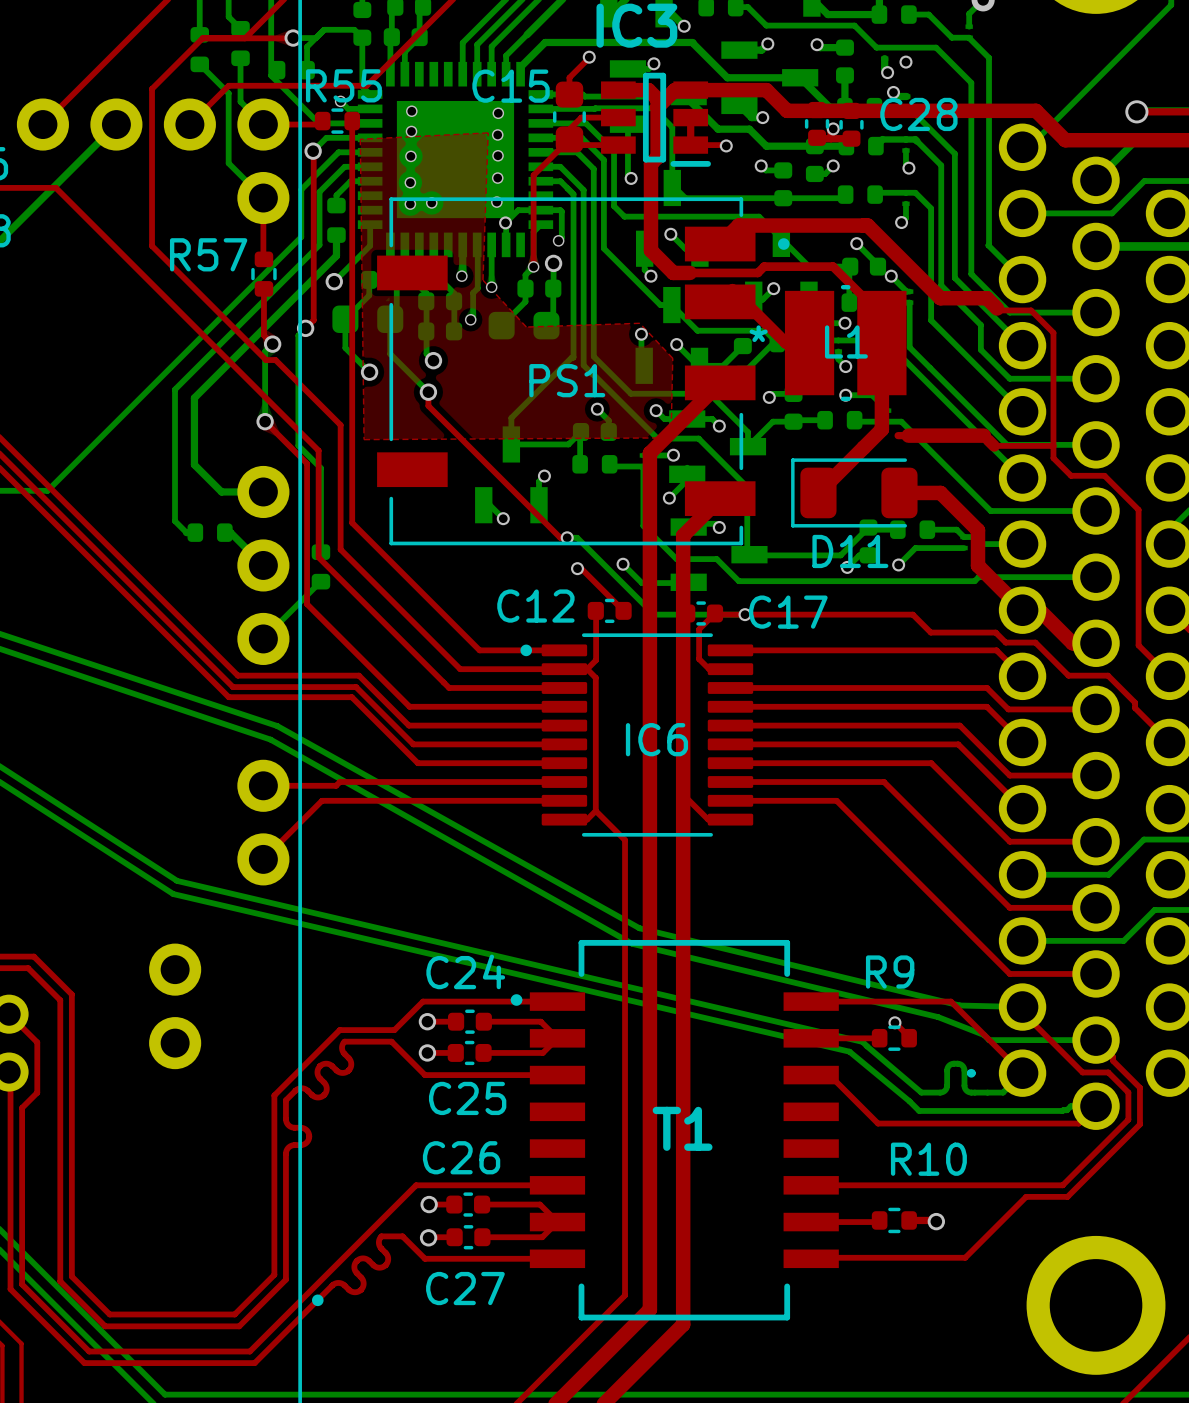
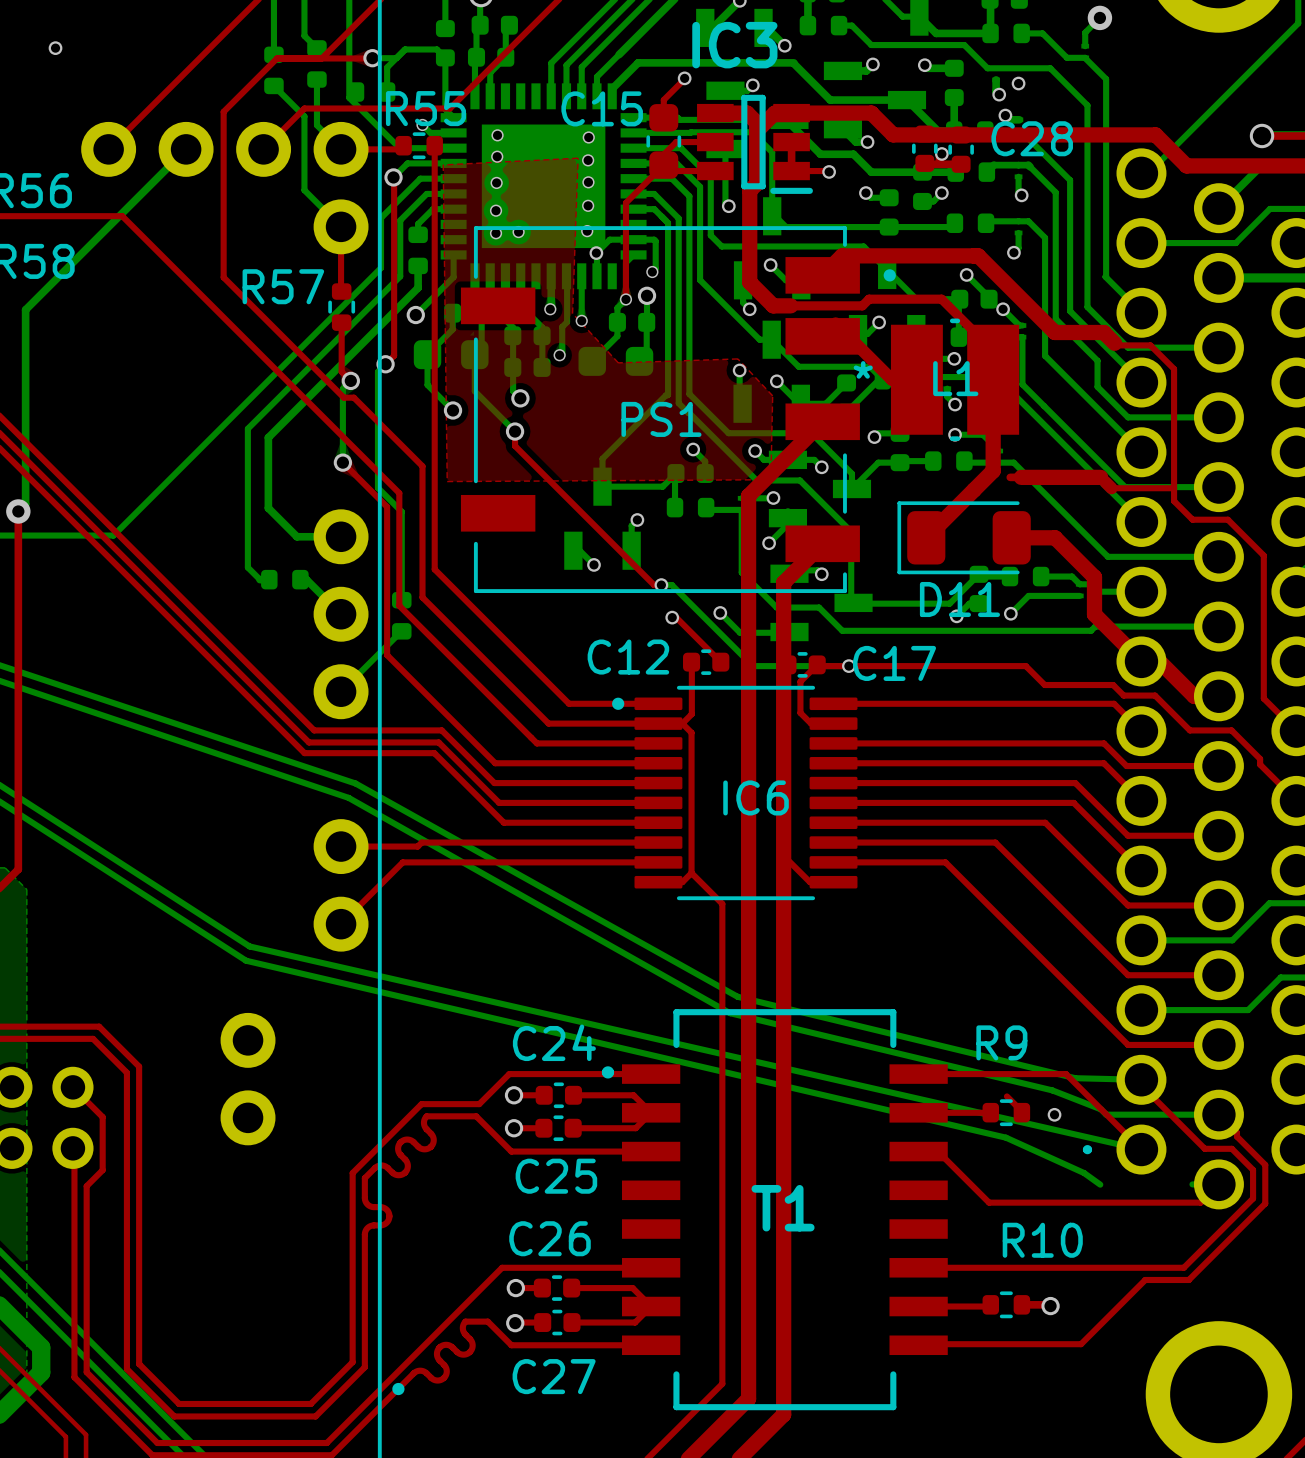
bottom track: (176, 880) (862, 1041) (921, 1092) (940, 1092) (945, 1090) (947, 1086) (947, 1069) (952, 1063) (959, 1063) (963, 1066) (964, 1087) (970, 1092) (1003, 1092) (1022, 1073) -> (249, 946) (1141, 1149)
bottom track: (173, 894) (849, 1051) (919, 1110) (1062, 1110) (1066, 1110) (1070, 1106) -> (246, 960) (1006, 1137) (1084, 1173) (1100, 1184)
via position: (894, 1022) -> (1054, 1114)

